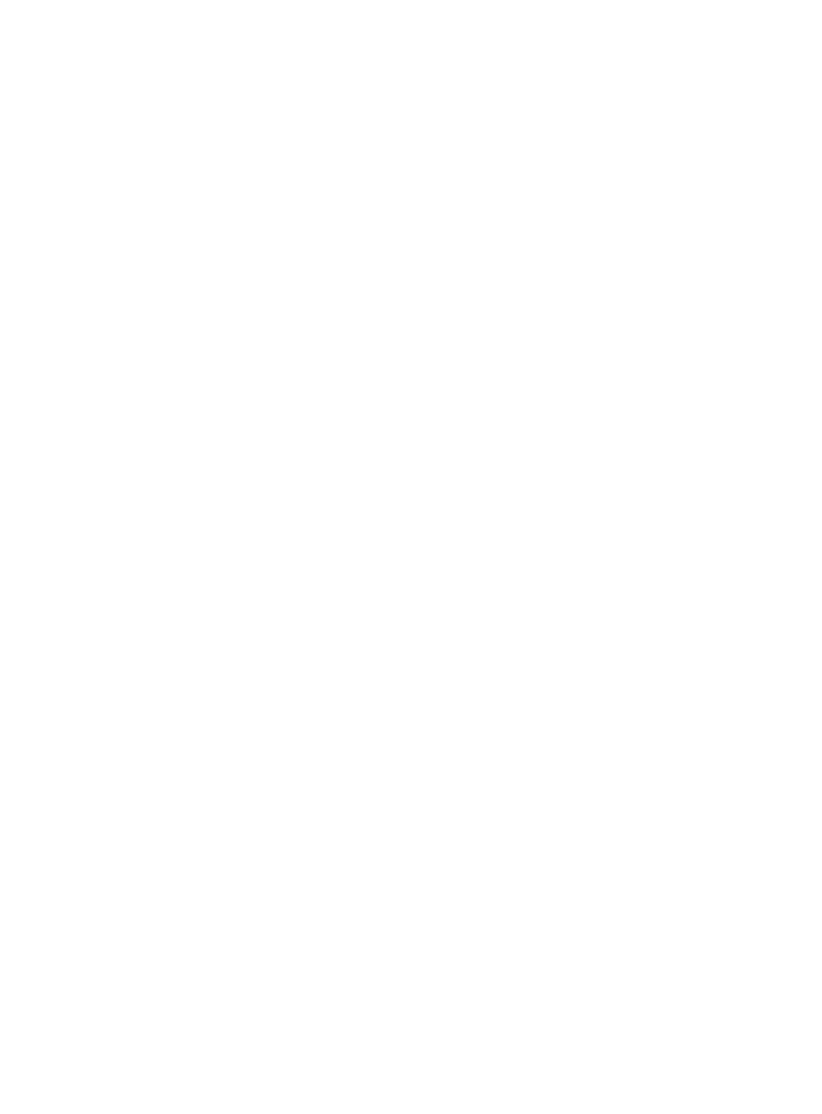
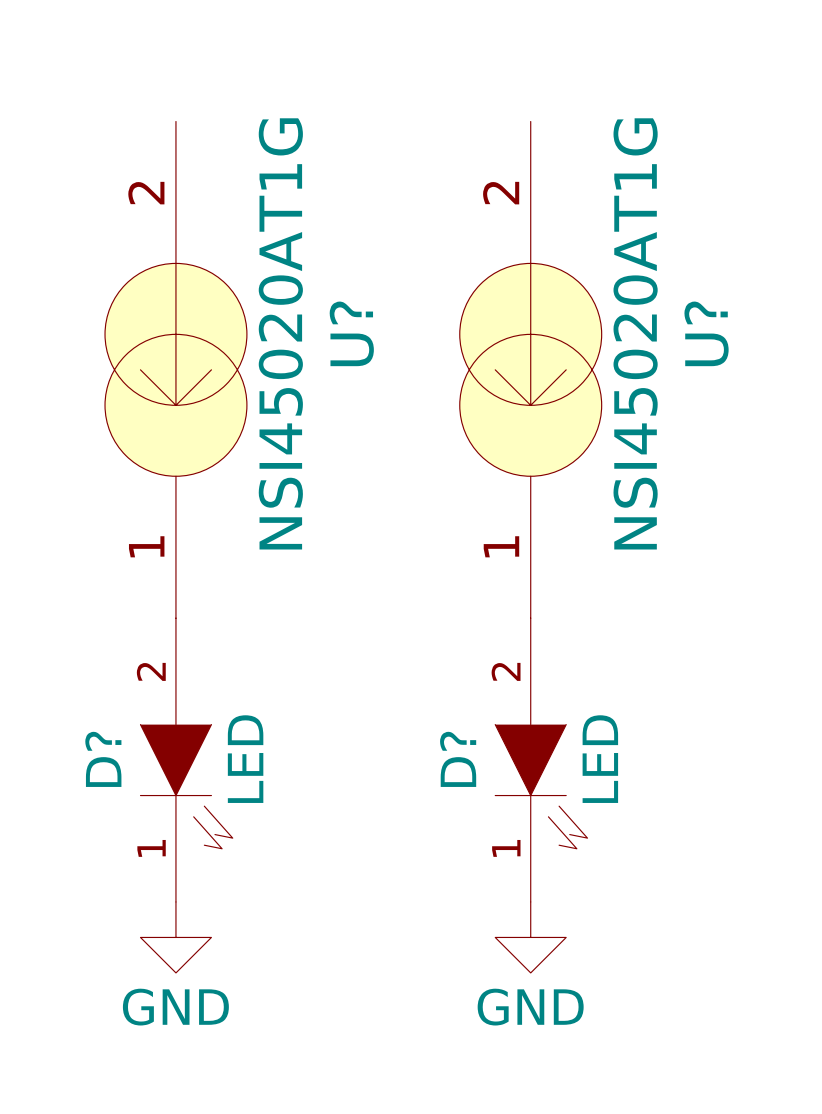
U?: none -> NSI45020AT1G (175, 369)
U?: none -> NSI45020AT1G (530, 369)
D?: none -> LED (186, 760)
D?: none -> LED (541, 760)
power symbol: none -> GND (175, 937)
power symbol: none -> GND (530, 937)

